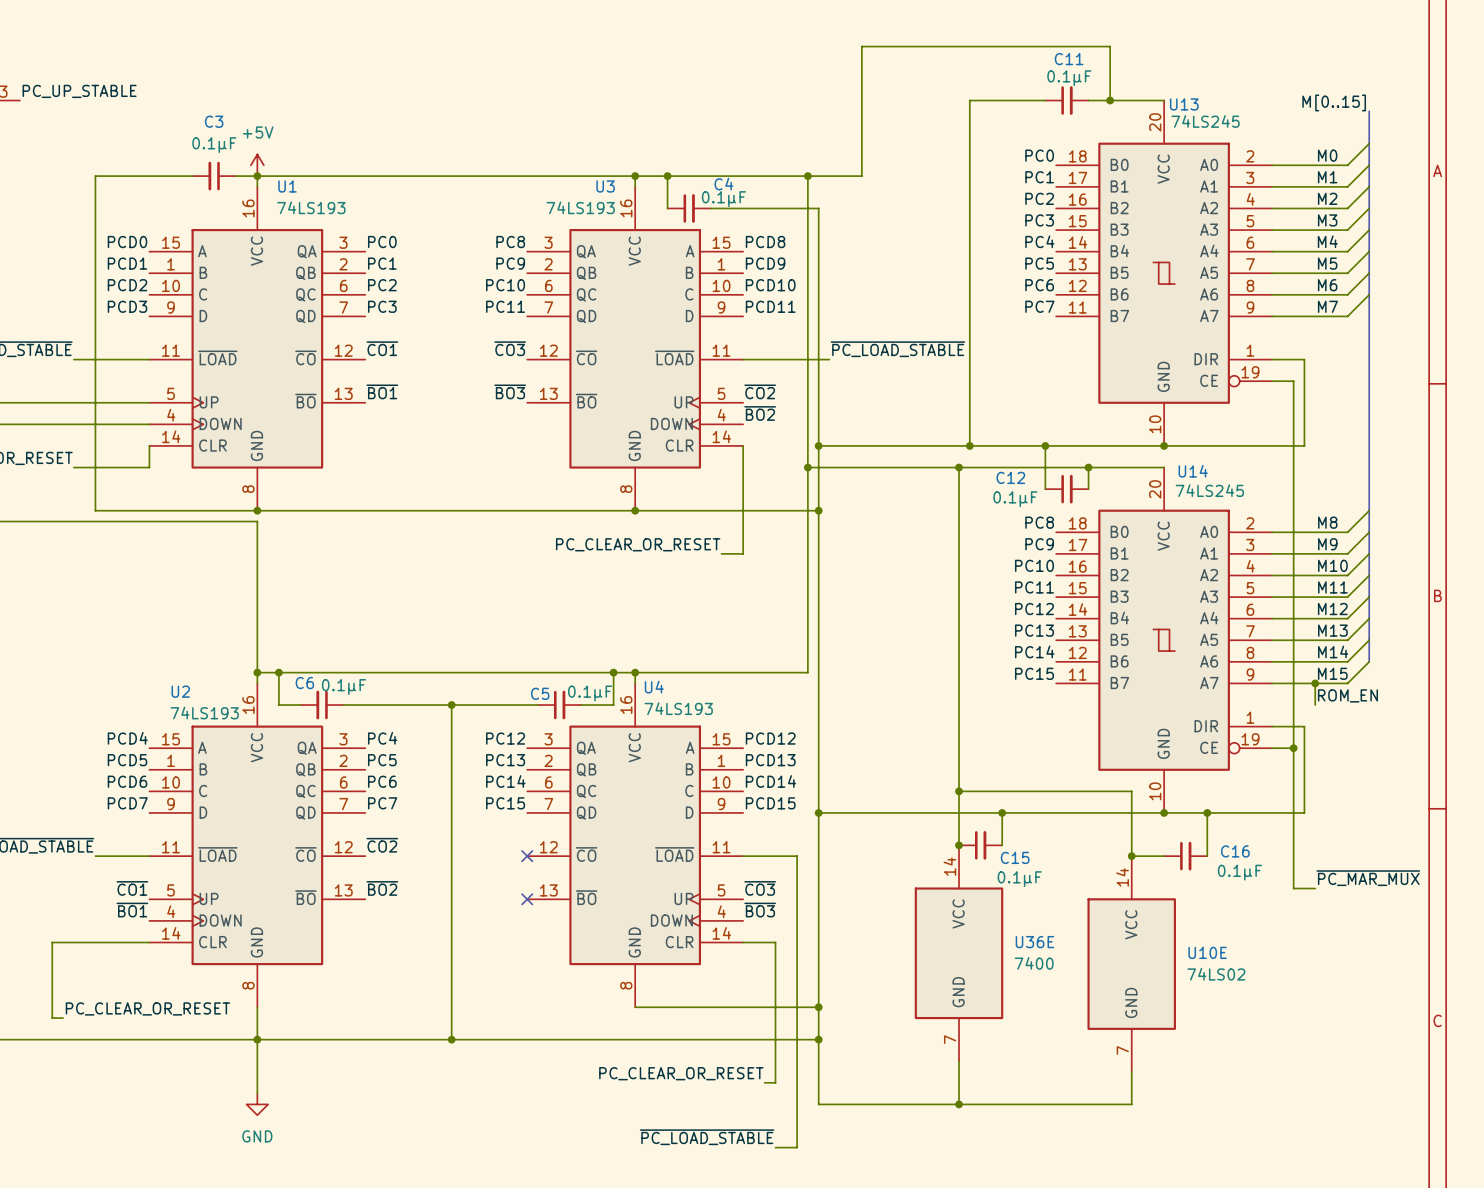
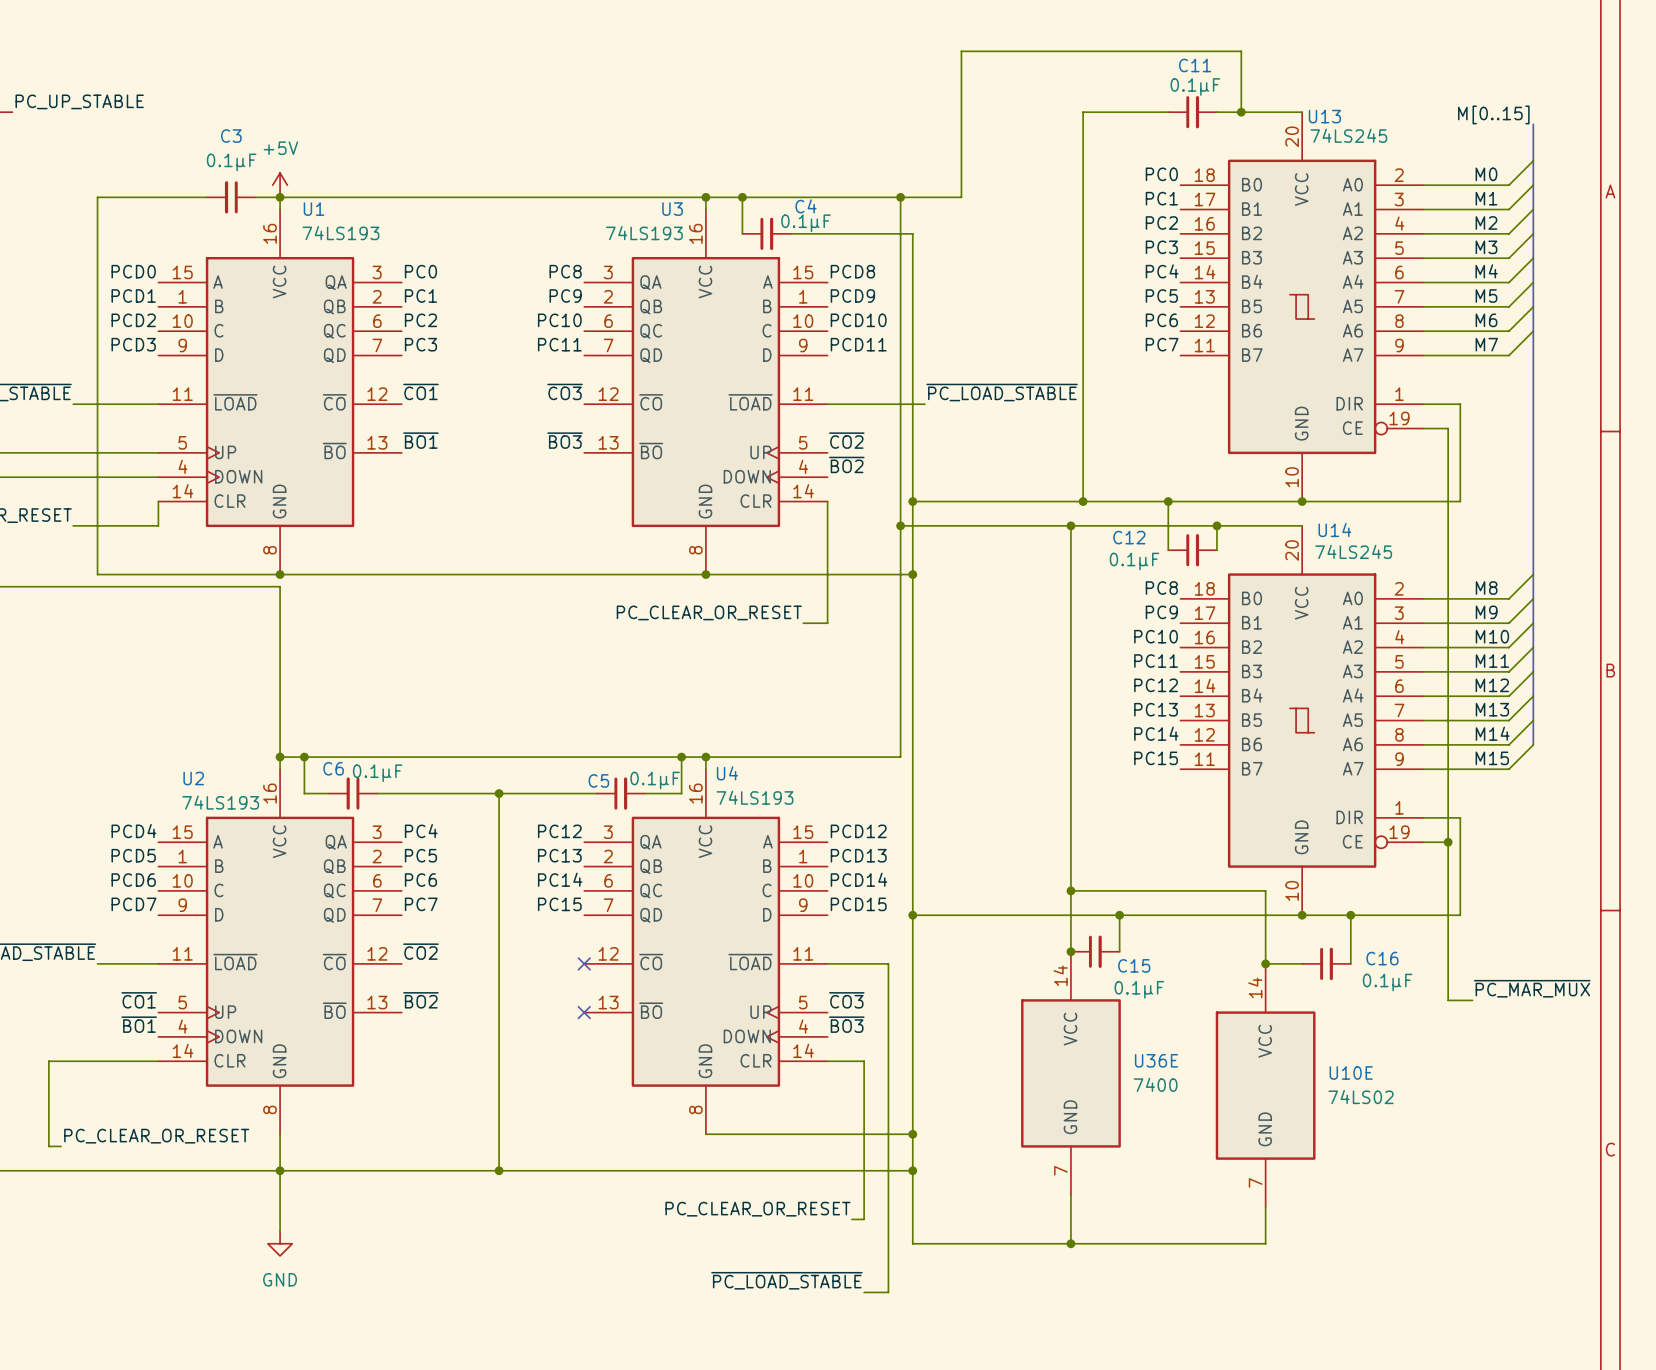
wire: (1315, 683) (1315, 705) -> none
junction: (1315, 683) -> none
label: ROM_EN (1347, 695) -> none

